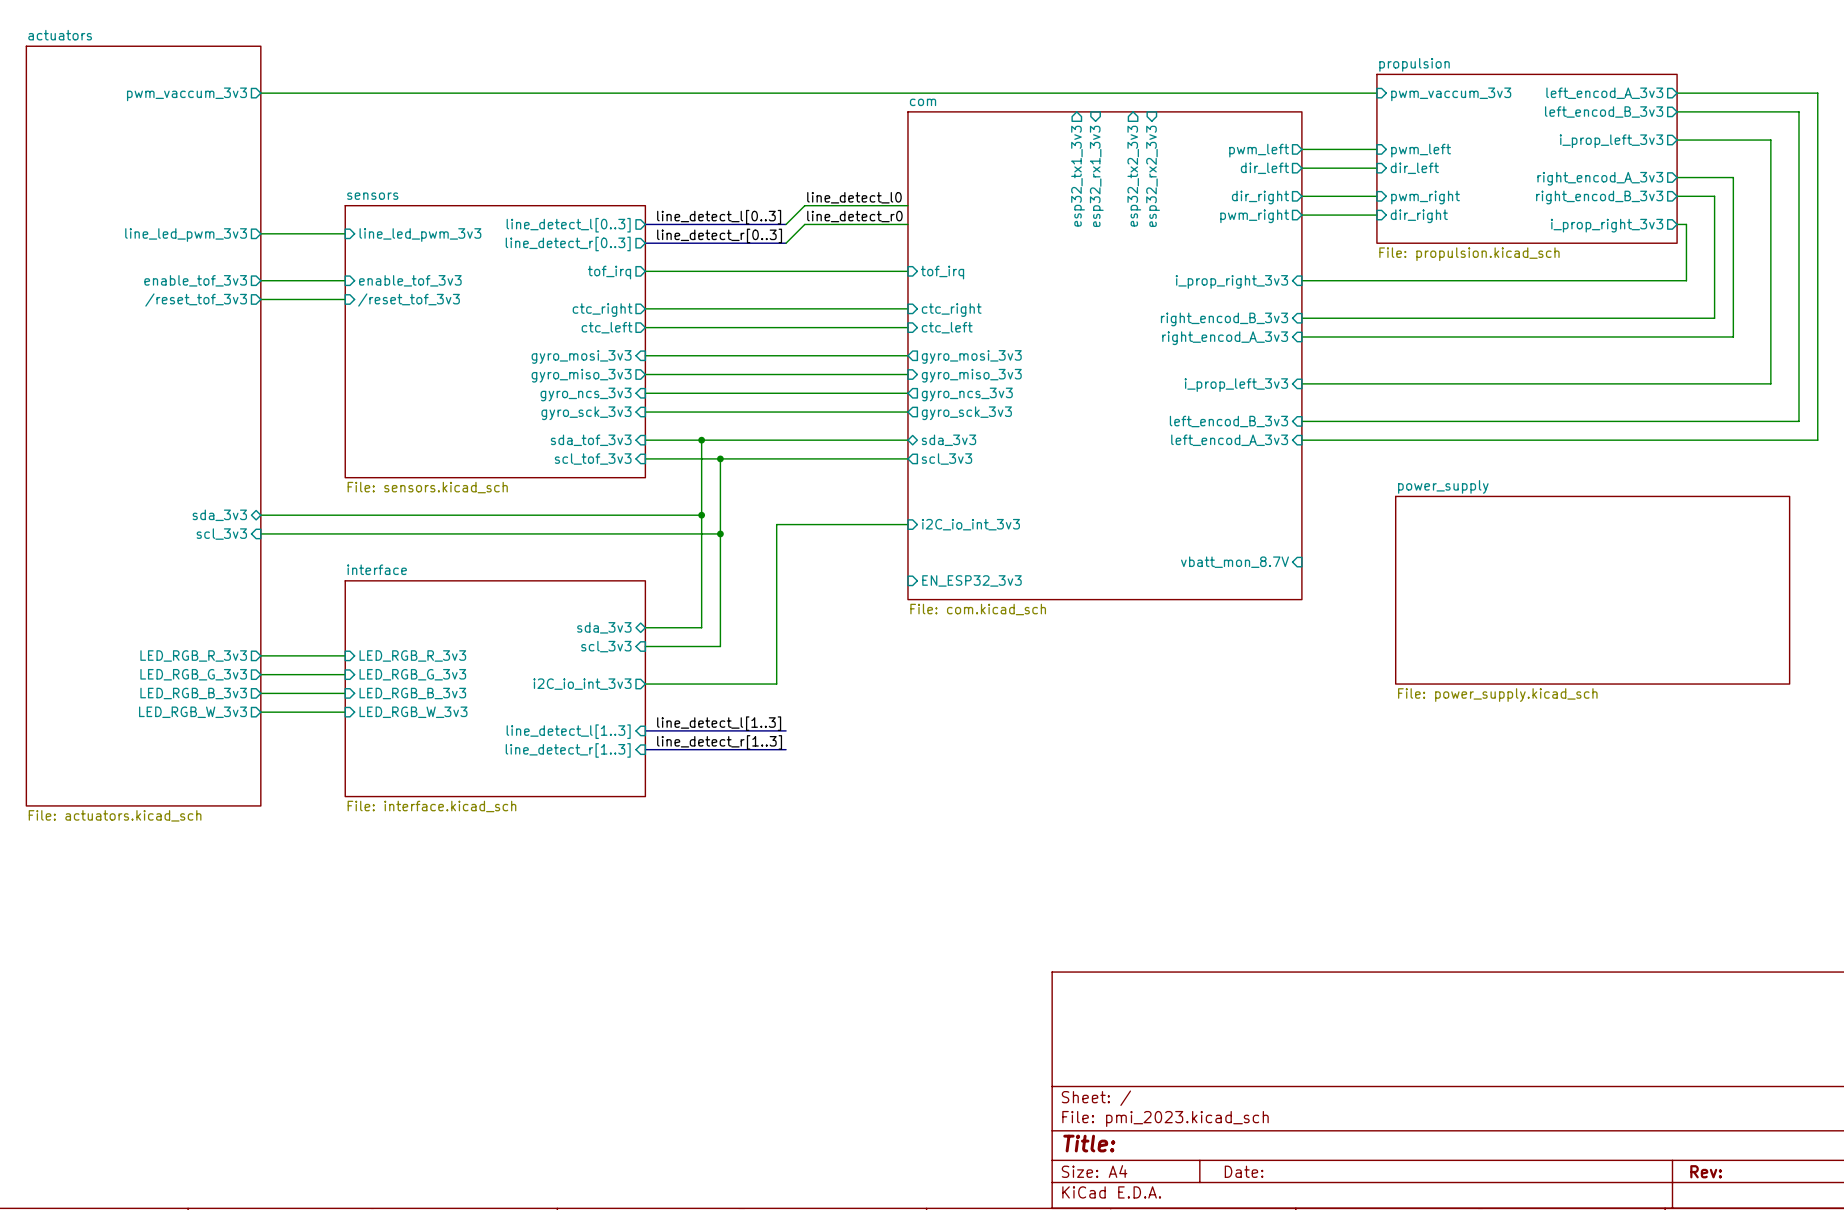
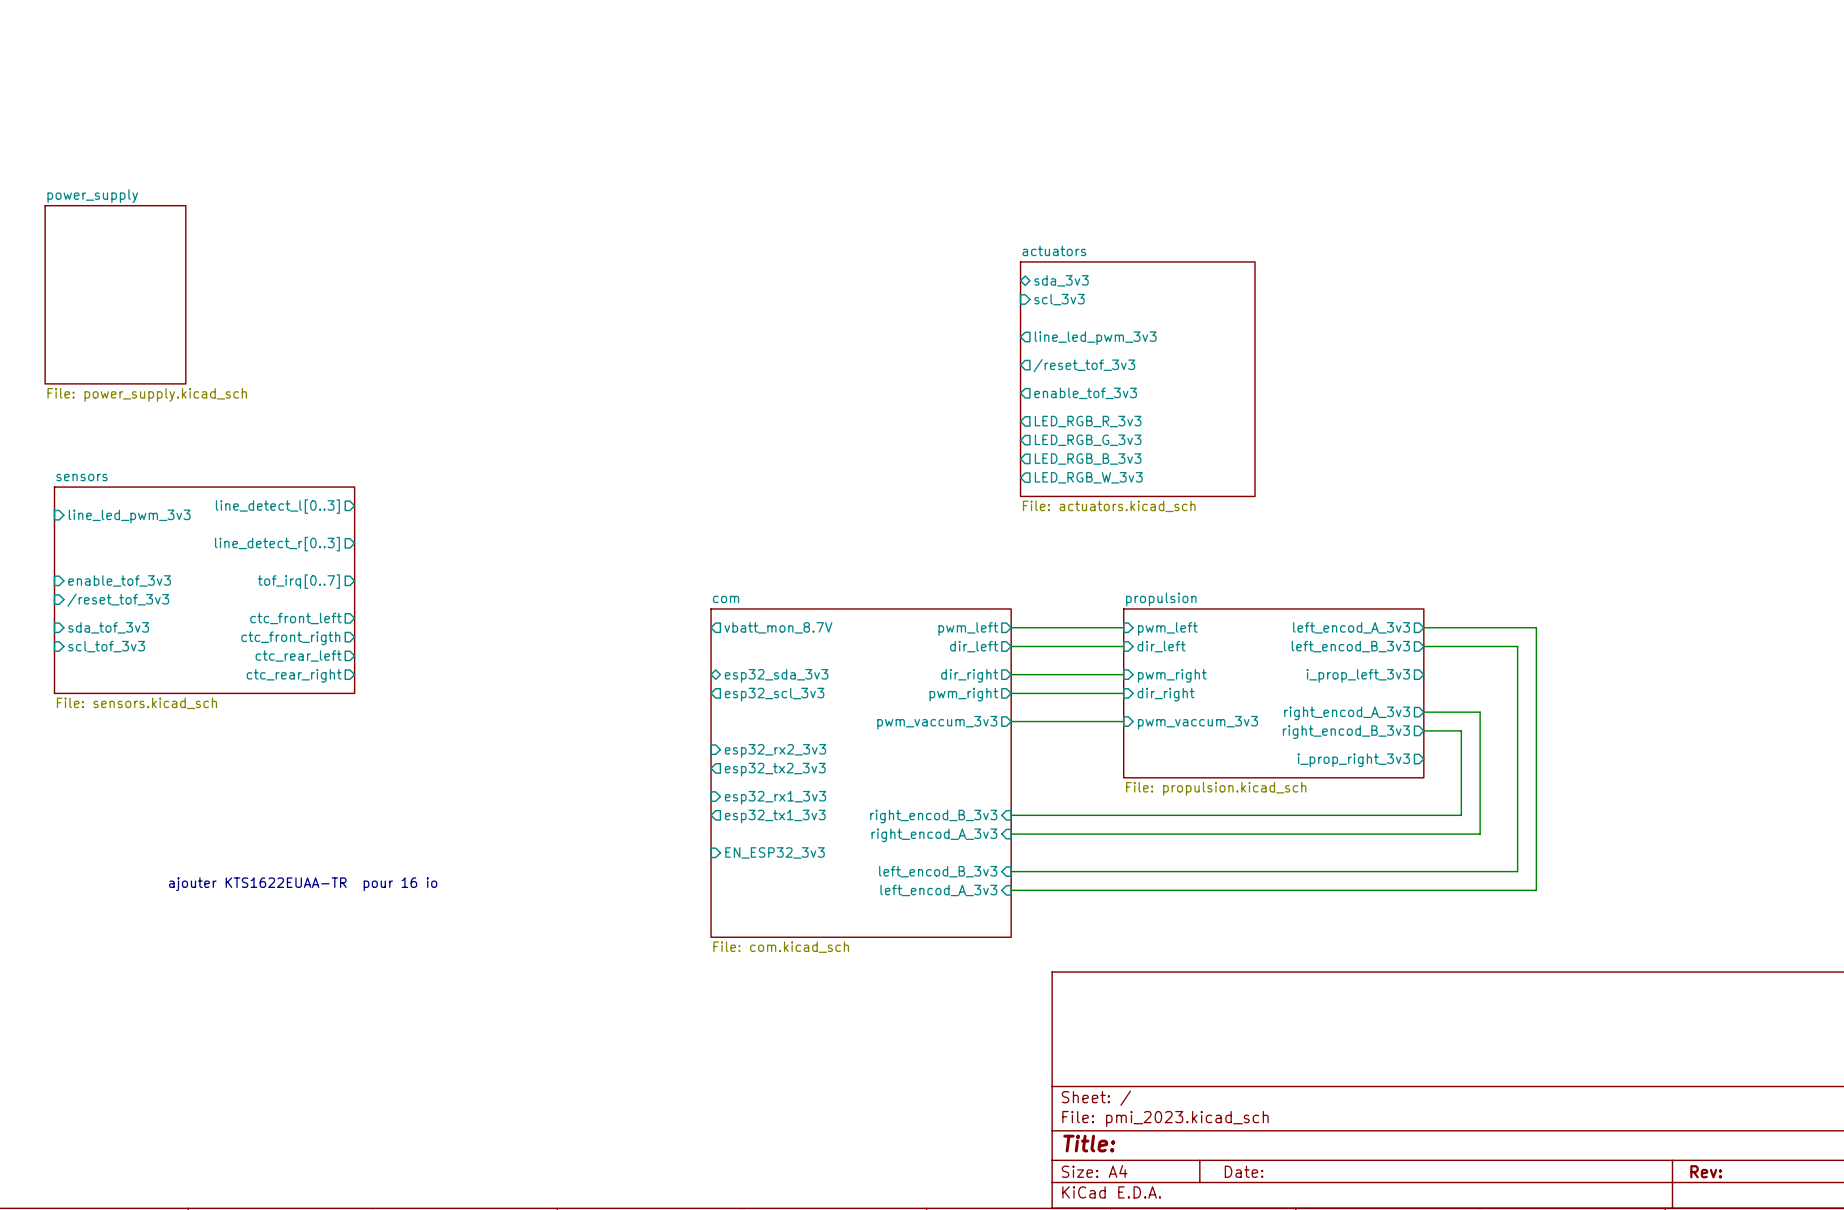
wire: (260, 93) (1376, 93) -> none
sheet pin: left_encod_A_3v3 (1604, 93) -> none
wire: (1677, 93) (1817, 93) (1817, 440) (1301, 440) -> none
sheet pin: pwm_vaccum_3v3 (186, 94) -> none
sheet pin: pwm_vaccum_3v3 (1451, 94) -> none
sheet pin: left_encod_B_3v3 (1604, 111) -> none
wire: (1677, 111) (1798, 111) (1798, 421) (1301, 421) -> none
wire: (1677, 140) (1770, 140) (1770, 383) (1301, 383) -> none
sheet pin: i_prop_left_3v3 (1611, 141) -> none
wire: (1301, 149) (1376, 149) -> none
sheet pin: pwm_left (1259, 150) -> none
sheet pin: pwm_left (1421, 150) -> none
sheet propulsion: File: propulsion.kicad_sch (1527, 158) -> none
sheet pin: dir_left (1264, 168) -> none
wire: (1301, 168) (1376, 168) -> none
sheet pin: dir_left (1414, 168) -> none
sheet pin: esp32_tx1_3v3 (1078, 176) -> none
sheet pin: esp32_rx1_3v3 (1096, 176) -> none
sheet pin: esp32_tx2_3v3 (1134, 176) -> none
sheet pin: esp32_rx2_3v3 (1153, 176) -> none
wire: (1677, 177) (1733, 177) (1733, 336) (1301, 336) -> none
sheet pin: right_encod_A_3v3 (1600, 178) -> none
wire: (1301, 196) (1376, 196) -> none
wire: (1677, 196) (1714, 196) (1714, 318) (1301, 318) -> none
label: line_detect_l0 (854, 197) -> none
sheet pin: dir_right (1260, 197) -> none
sheet pin: pwm_right (1425, 197) -> none
sheet pin: right_encod_B_3v3 (1599, 197) -> none
wire: (907, 205) (804, 205) (786, 224) -> none
wire: (1301, 215) (1376, 215) -> none
label: line_detect_r0 (854, 216) -> none
sheet pin: pwm_right (1254, 216) -> none
sheet pin: dir_right (1419, 216) -> none
label: line_detect_l[0..3] (719, 217) -> none
bus: (645, 224) (786, 224) -> none
wire: (907, 224) (804, 224) (786, 243) -> none
wire: (1677, 224) (1686, 224) (1686, 280) (1301, 280) -> none
sheet pin: line_detect_l[0..3] (568, 225) -> none
sheet pin: i_prop_right_3v3 (1607, 225) -> none
wire: (260, 233) (345, 233) -> none
sheet pin: line_led_pwm_3v3 (186, 235) -> none
sheet pin: line_led_pwm_3v3 (420, 235) -> none
label: line_detect_r[0..3] (719, 235) -> none
sheet pin: line_detect_r[0..3] (568, 243) -> none
bus: (645, 243) (786, 243) -> none
wire: (645, 271) (907, 271) -> none
sheet pin: tof_irq (609, 272) -> none
sheet pin: tof_irq (942, 272) -> none
sheet pin: enable_tof_3v3 (195, 280) -> none
wire: (260, 280) (345, 280) -> none
sheet pin: enable_tof_3v3 (410, 280) -> none
sheet pin: none -> sda_3v3 (1061, 280)
sheet pin: i_prop_right_3v3 (1231, 281) -> none
sheet power_supply: none -> File: power_supply.kicad_sch (115, 294)
wire: (260, 299) (345, 299) -> none
sheet pin: none -> scl_3v3 (1059, 299)
sheet pin: /reset_tof_3v3 (196, 300) -> none
sheet pin: /reset_tof_3v3 (409, 300) -> none
wire: (645, 308) (907, 308) -> none
sheet pin: ctc_right (602, 310) -> none
sheet pin: ctc_right (951, 310) -> none
sheet pin: right_encod_B_3v3 (1224, 319) -> none
sheet pin: ctc_left (607, 327) -> none
wire: (645, 327) (907, 327) -> none
sheet pin: ctc_left (947, 327) -> none
sheet pin: none -> line_led_pwm_3v3 (1095, 338)
sheet pin: right_encod_A_3v3 (1225, 338) -> none
sheet sensors: File: sensors.kicad_sch (495, 341) -> none
wire: (645, 355) (907, 355) -> none
sheet com: File: com.kicad_sch (1104, 355) -> none
sheet pin: gyro_mosi_3v3 (581, 356) -> none
sheet pin: gyro_mosi_3v3 (971, 356) -> none
sheet pin: none -> /reset_tof_3v3 (1084, 365)
wire: (645, 374) (907, 374) -> none
sheet pin: gyro_miso_3v3 (581, 375) -> none
sheet pin: gyro_miso_3v3 (971, 375) -> none
sheet actuators: none -> File: actuators.kicad_sch (1137, 379)
sheet pin: i_prop_left_3v3 (1236, 385) -> none
wire: (645, 393) (907, 393) -> none
sheet pin: none -> enable_tof_3v3 (1085, 393)
sheet pin: gyro_ncs_3v3 (586, 394) -> none
sheet pin: gyro_ncs_3v3 (967, 394) -> none
wire: (645, 412) (907, 412) -> none
sheet pin: gyro_sck_3v3 (586, 413) -> none
sheet pin: gyro_sck_3v3 (966, 413) -> none
sheet pin: none -> LED_RGB_R_3v3 (1088, 421)
sheet pin: left_encod_B_3v3 (1228, 421) -> none
sheet actuators: File: actuators.kicad_sch (143, 426) -> none
sheet pin: sda_tof_3v3 (591, 440) -> none
wire: (645, 440) (907, 440) -> none
wire: (701, 440) (701, 627) (645, 627) -> none
junction: (701, 440) -> none
sheet pin: sda_3v3 (949, 440) -> none
sheet pin: none -> LED_RGB_G_3v3 (1088, 440)
sheet pin: left_encod_A_3v3 (1229, 440) -> none
wire: (645, 458) (907, 458) -> none
wire: (720, 458) (720, 646) (645, 646) -> none
junction: (720, 458) -> none
sheet pin: scl_tof_3v3 (593, 459) -> none
sheet pin: scl_3v3 (946, 459) -> none
sheet pin: none -> LED_RGB_B_3v3 (1088, 459)
sheet pin: none -> LED_RGB_W_3v3 (1088, 477)
sheet pin: none -> line_detect_l[0..3] (277, 506)
sheet pin: sda_3v3 (219, 515) -> none
wire: (260, 515) (701, 515) -> none
junction: (701, 515) -> none
sheet pin: none -> line_led_pwm_3v3 (129, 516)
wire: (907, 524) (776, 524) (776, 684) (645, 684) -> none
sheet pin: i2C_io_int_3v3 (970, 524) -> none
wire: (260, 533) (720, 533) -> none
junction: (720, 533) -> none
sheet pin: scl_3v3 (221, 534) -> none
sheet pin: none -> line_detect_r[0..3] (277, 544)
sheet pin: vbatt_mon_8.7V (1234, 562) -> none
sheet pin: none -> enable_tof_3v3 (119, 580)
sheet pin: EN_ESP32_3v3 (972, 580) -> none
sheet pin: none -> tof_irq[0..7] (298, 581)
sheet sensors: none -> File: sensors.kicad_sch (204, 590)
sheet power_supply: File: power_supply.kicad_sch (1592, 590) -> none
sheet pin: none -> /reset_tof_3v3 (118, 600)
sheet pin: none -> ctc_front_left (295, 618)
sheet pin: none -> sda_tof_3v3 (108, 627)
sheet pin: sda_3v3 (604, 627) -> none
sheet pin: none -> vbatt_mon_8.7V (778, 627)
wire: none -> (1011, 627) (1123, 627)
sheet pin: none -> left_encod_A_3v3 (1351, 627)
wire: none -> (1423, 627) (1536, 627) (1536, 890) (1011, 890)
sheet pin: none -> pwm_left (968, 628)
sheet pin: none -> pwm_left (1167, 628)
sheet pin: none -> ctc_front_rigth (290, 638)
sheet pin: none -> scl_tof_3v3 (106, 646)
sheet pin: scl_3v3 (606, 646) -> none
sheet pin: none -> dir_left (974, 646)
wire: none -> (1011, 646) (1123, 646)
sheet pin: none -> dir_left (1161, 646)
sheet pin: none -> left_encod_B_3v3 (1350, 646)
wire: none -> (1423, 646) (1517, 646) (1517, 871) (1011, 871)
sheet pin: LED_RGB_R_3v3 (193, 655) -> none
wire: (260, 655) (345, 655) -> none
sheet pin: none -> ctc_rear_left (298, 655)
sheet pin: LED_RGB_R_3v3 (412, 655) -> none
sheet pin: LED_RGB_G_3v3 (193, 674) -> none
wire: (260, 674) (345, 674) -> none
sheet pin: LED_RGB_G_3v3 (412, 674) -> none
wire: none -> (1011, 674) (1123, 674)
sheet pin: none -> ctc_rear_right (294, 675)
sheet pin: none -> esp32_sda_3v3 (776, 675)
sheet pin: none -> dir_right (969, 675)
sheet pin: none -> pwm_right (1172, 675)
sheet pin: none -> i_prop_left_3v3 (1358, 675)
sheet pin: i2C_io_int_3v3 (582, 684) -> none
sheet interface: File: interface.kicad_sch (495, 688) -> none
sheet pin: LED_RGB_B_3v3 (193, 693) -> none
sheet pin: LED_RGB_B_3v3 (412, 693) -> none
wire: none -> (1011, 693) (1123, 693)
sheet propulsion: none -> File: propulsion.kicad_sch (1273, 693)
sheet pin: none -> esp32_scl_3v3 (774, 694)
sheet pin: none -> pwm_right (963, 694)
sheet pin: none -> dir_right (1166, 694)
sheet pin: LED_RGB_W_3v3 (193, 712) -> none
wire: (260, 712) (345, 712) -> none
sheet pin: LED_RGB_W_3v3 (413, 712) -> none
wire: none -> (1423, 712) (1480, 712) (1480, 834) (1011, 834)
sheet pin: none -> right_encod_A_3v3 (1347, 713)
wire: none -> (1011, 721) (1123, 721)
sheet pin: none -> pwm_vaccum_3v3 (937, 722)
sheet pin: none -> pwm_vaccum_3v3 (1197, 722)
label: line_detect_l[1..3] (719, 723) -> none
bus: (645, 730) (786, 730) -> none
wire: none -> (1423, 730) (1461, 730) (1461, 815) (1011, 815)
sheet pin: line_detect_l[1..3] (568, 731) -> none
sheet pin: none -> right_encod_B_3v3 (1346, 732)
label: line_detect_r[1..3] (719, 742) -> none
bus: (645, 749) (786, 749) -> none
sheet pin: line_detect_r[1..3] (568, 750) -> none
sheet pin: none -> esp32_rx2_3v3 (775, 750)
sheet pin: none -> i_prop_right_3v3 (1353, 760)
sheet pin: none -> esp32_tx2_3v3 (775, 769)
sheet com: none -> File: com.kicad_sch (861, 773)
sheet pin: none -> esp32_rx1_3v3 (775, 797)
sheet pin: none -> esp32_tx1_3v3 (775, 816)
sheet pin: none -> right_encod_B_3v3 (933, 816)
sheet pin: none -> right_encod_A_3v3 (934, 835)
sheet pin: none -> EN_ESP32_3v3 (775, 852)
sheet pin: none -> left_encod_B_3v3 (938, 871)
text: none -> ajouter KTS1622EUAA-TR pour 16 io (303, 884)
sheet pin: none -> left_encod_A_3v3 (938, 890)

